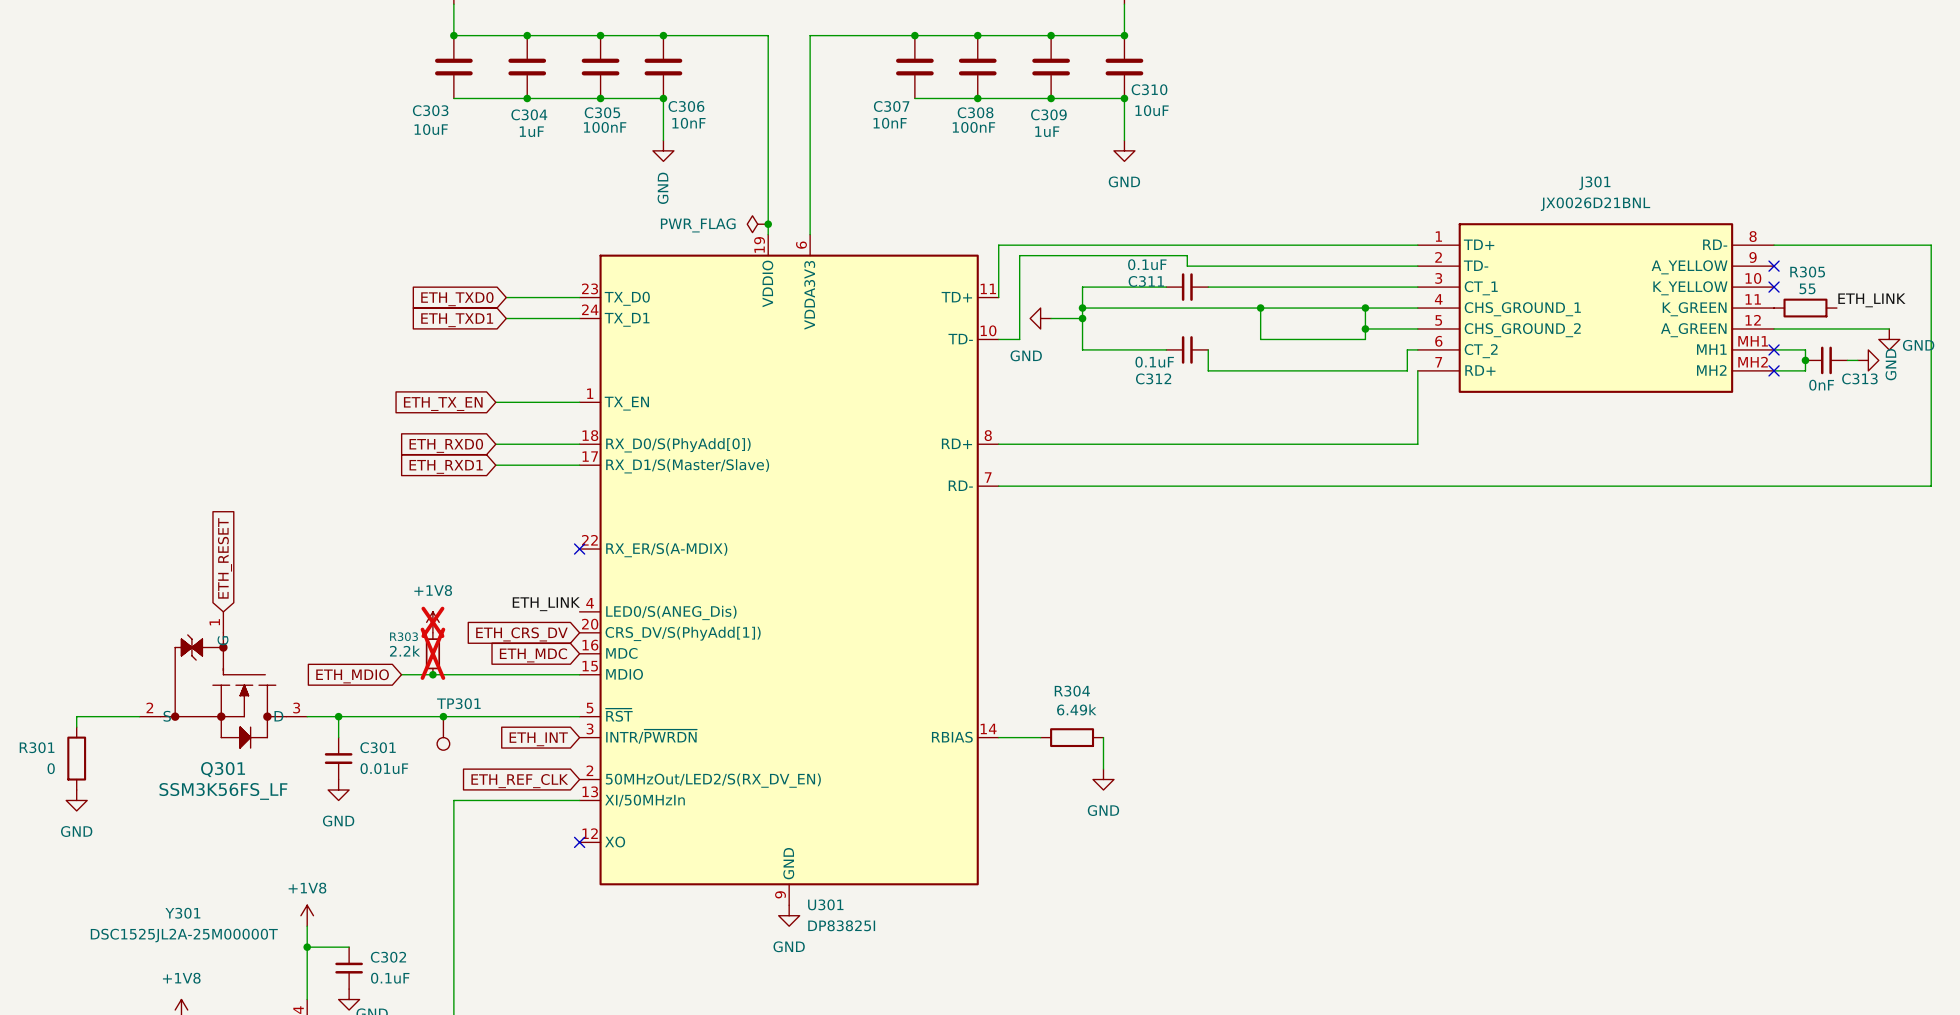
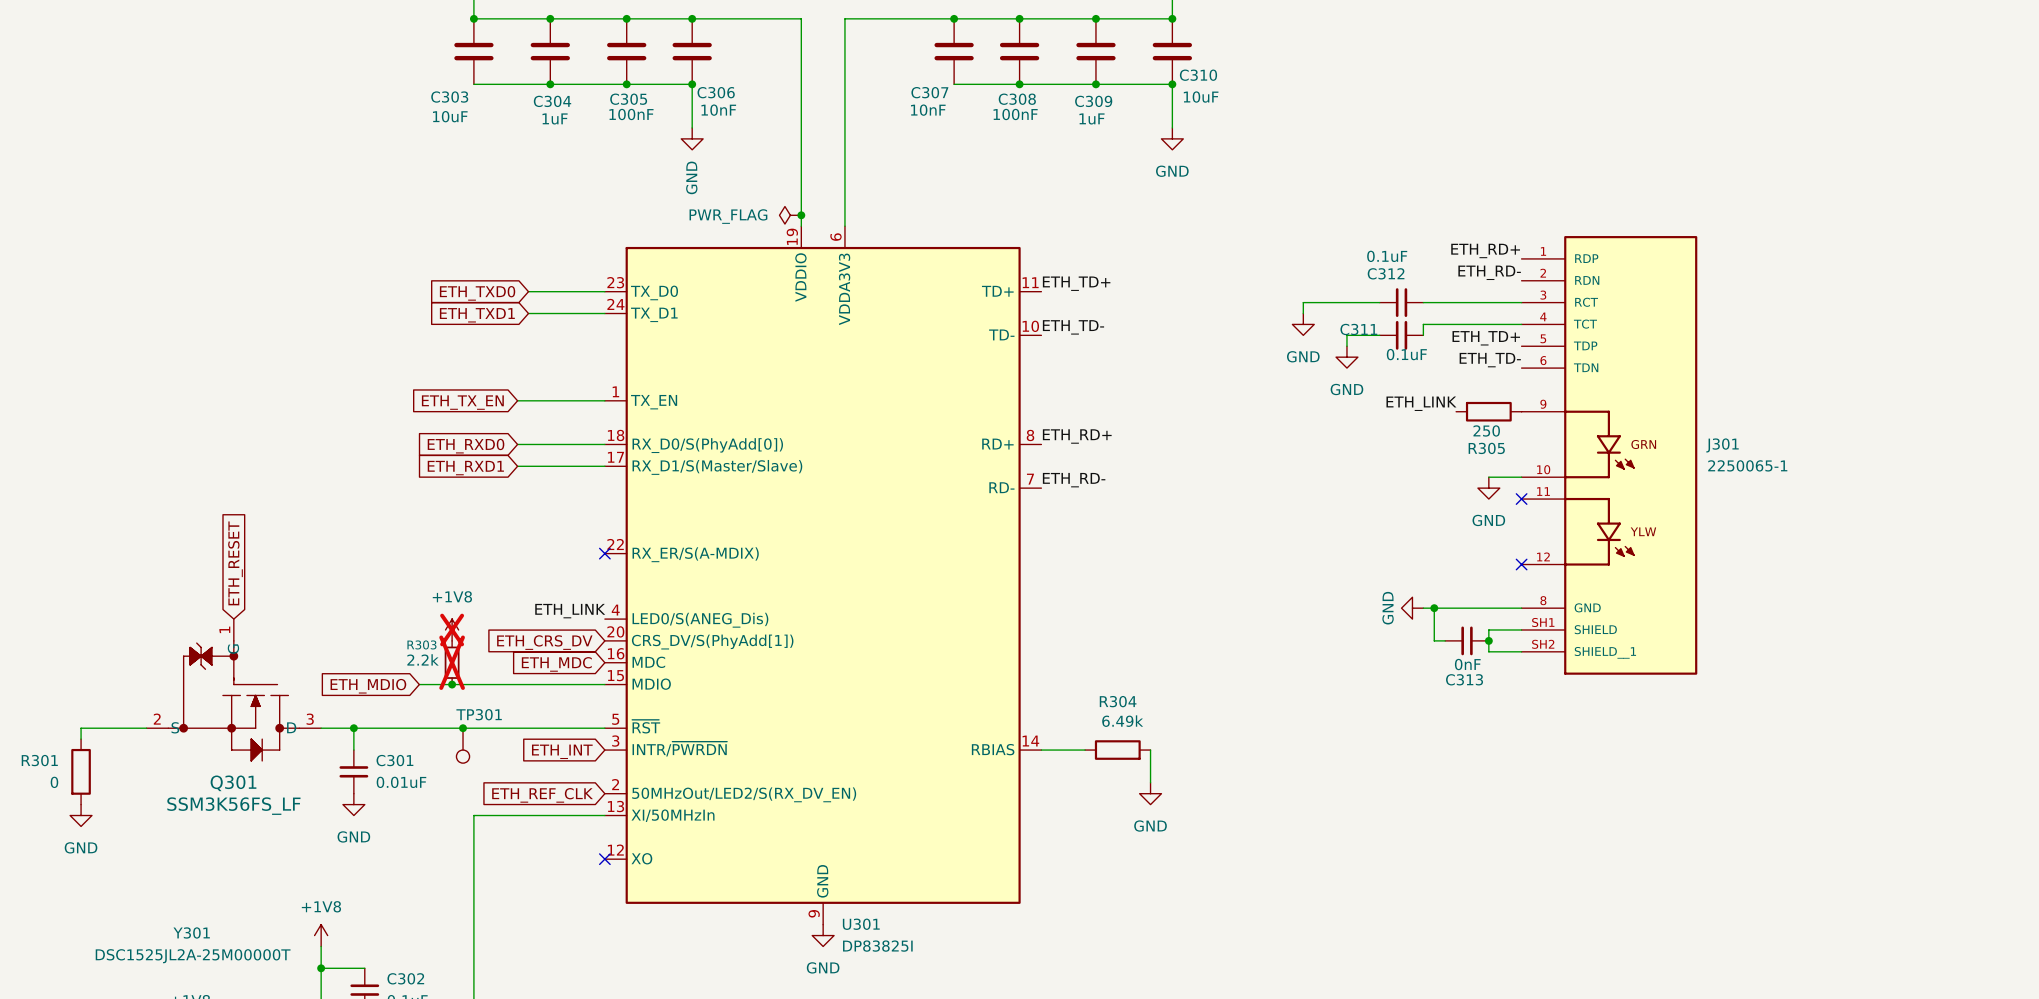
J301 name position: J301 (1594, 183) -> J301 (1722, 445)
J301 value: JX0026D21BNL (1595, 204) -> 2250065-1 (1747, 465)
J301 symbol: [1417, 223, 1775, 393] -> [1521, 236, 1698, 675]
wire: (1417, 245) (998, 245) (998, 297) -> none
wire: (1774, 245) (1931, 245) (1931, 486) (998, 486) -> none
label: none -> ETH_RD+ (1485, 250)
C311 value position: 0.1uF (1147, 264) -> 0.1uF (1406, 354)
wire: (1417, 266) (1187, 266) (1187, 255) (1019, 255) (1019, 339) (998, 339) -> none
no-connect mark: (1774, 266) -> none
R305 name position: R305 (1807, 272) -> R305 (1486, 448)
label: none -> ETH_RD- (1489, 272)
wire: (1166, 287) (1082, 287) (1082, 349) (1166, 349) -> none
C311 position: (1187, 287) -> (1401, 335)
wire: (1208, 287) (1417, 287) -> none
no-connect mark: (1774, 287) -> none
R305 value: 55 (1807, 288) -> 250 (1486, 430)
label: none -> ETH_TD+ (1076, 283)
label: ETH_LINK (1871, 300) -> none
wire: (1082, 308) (1250, 308) -> (1303, 313) (1303, 302)
junction: (1082, 308) -> none
wire: (1260, 308) (1260, 339) (1292, 339) -> (1346, 346) (1346, 335)
junction: (1260, 308) -> none
wire: (1323, 308) (1365, 308) (1365, 328) -> none
junction: (1365, 308) -> none
R305 position: (1805, 308) -> (1488, 411)
power symbol: GND (1040, 318) -> none
wire: (1051, 318) (1082, 318) -> none
junction: (1082, 318) -> none
power symbol: none -> GND (1303, 324)
junction: (1365, 328) -> none
wire: (1774, 328) (1889, 328) -> none
label: none -> ETH_TD- (1073, 327)
power symbol: GND (1889, 339) -> none
label: none -> ETH_TD+ (1486, 338)
C312 position: (1187, 349) -> (1401, 302)
wire: (1208, 349) (1208, 370) (1407, 370) (1407, 349) (1417, 349) -> none
wire: (1774, 349) (1805, 349) (1805, 370) (1774, 370) -> none
no-connect mark: (1774, 349) -> none
power symbol: none -> GND (1346, 357)
junction: (1805, 360) -> none
C313 position: (1826, 360) -> (1467, 640)
wire: (1847, 360) (1857, 360) -> none
power symbol: GND (1868, 360) -> none
C312 value position: 0.1uF (1154, 362) -> 0.1uF (1387, 256)
label: none -> ETH_TD- (1490, 360)
wire: (1417, 370) (1417, 444) (998, 444) -> none
no-connect mark: (1774, 370) -> none
C312 name position: C312 (1153, 378) -> C312 (1386, 273)
C313 name position: C313 (1859, 378) -> C313 (1464, 679)
C313 value position: 0nF (1821, 385) -> 0nF (1467, 664)
label: none -> ETH_LINK (1421, 403)
label: none -> ETH_RD+ (1077, 436)
wire: none -> (1488, 477) (1521, 477)
label: none -> ETH_RD- (1074, 480)
power symbol: none -> GND (1488, 488)
no-connect mark: none -> (1521, 499)
no-connect mark: none -> (1521, 564)
power symbol: none -> GND (1412, 608)
wire: none -> (1423, 608) (1521, 608)
wire: none -> (1434, 608) (1434, 640) (1445, 640)
junction: none -> (1434, 608)
wire: none -> (1521, 629) (1488, 629) (1488, 651) (1521, 651)
junction: none -> (1488, 640)

